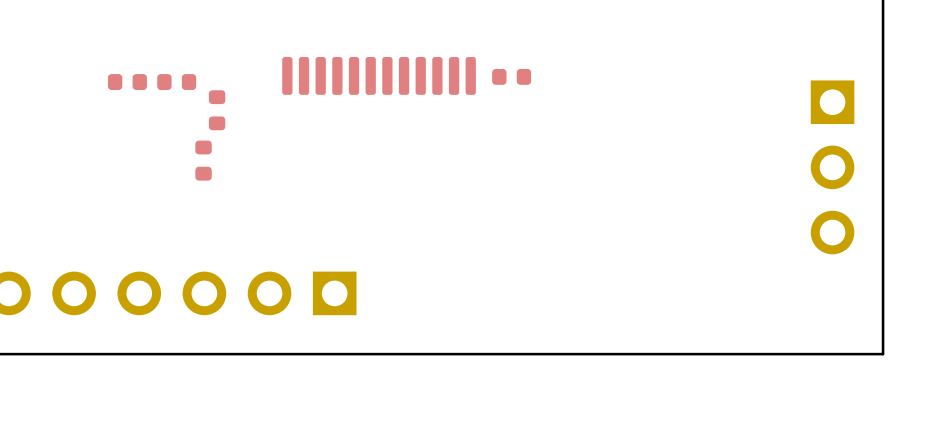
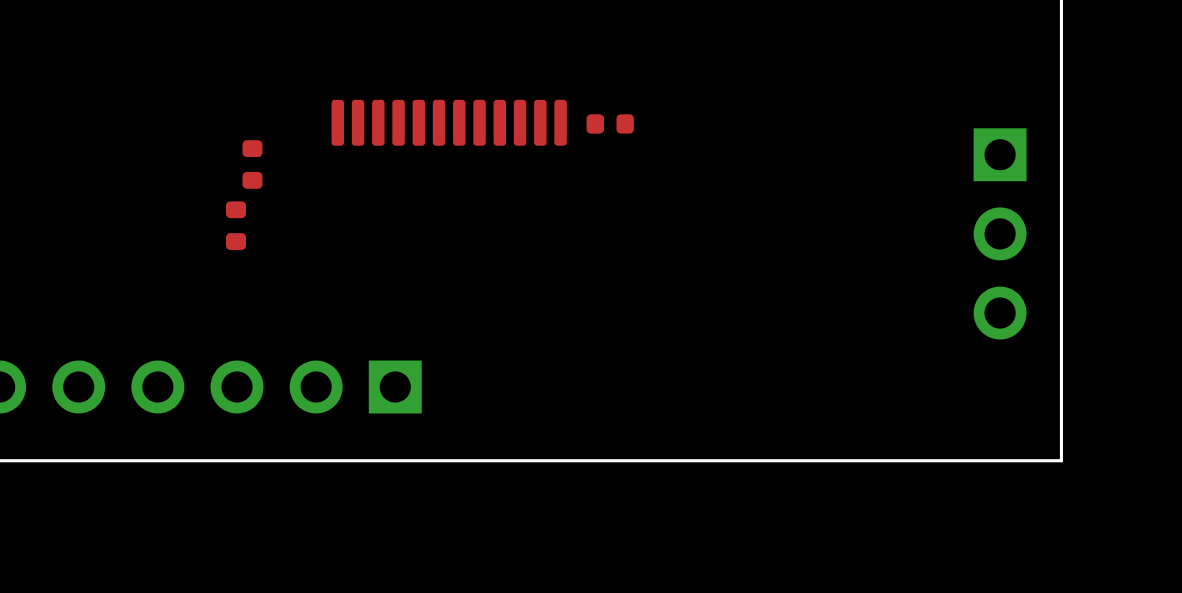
part: (127, 82) -> none
part: (176, 82) -> none

